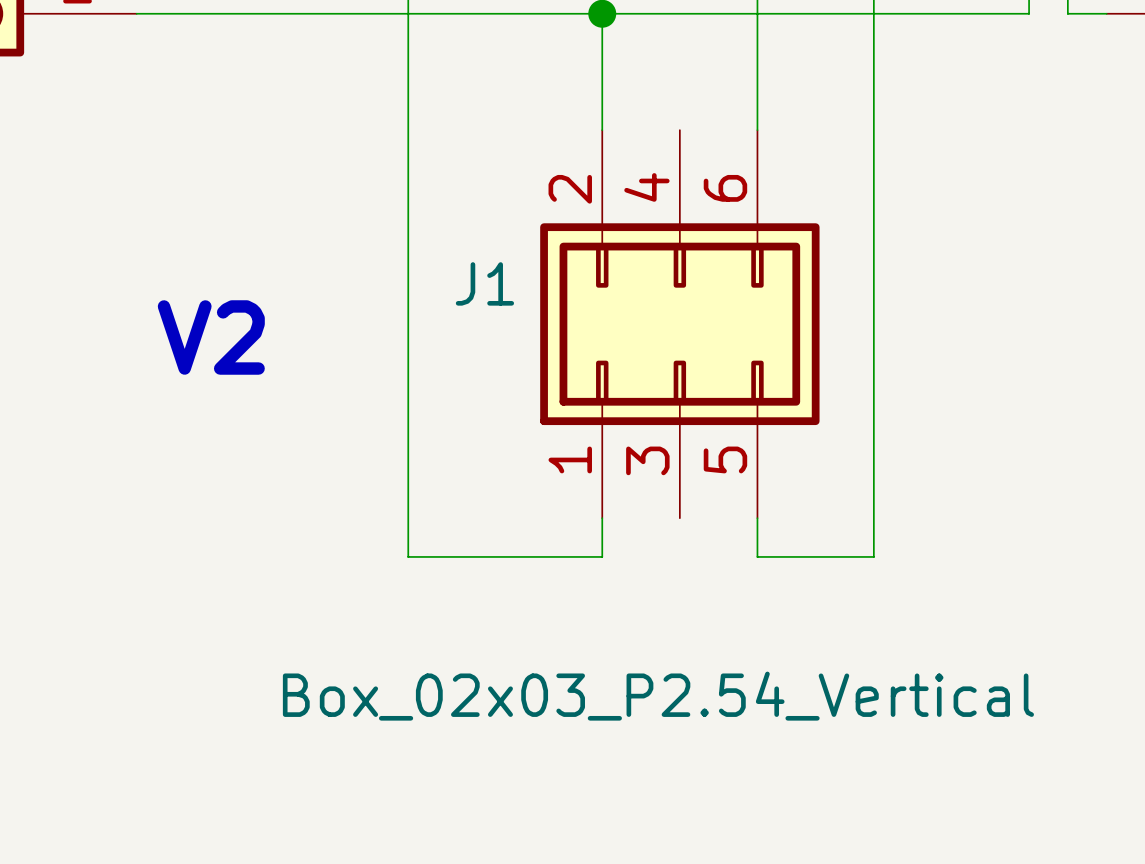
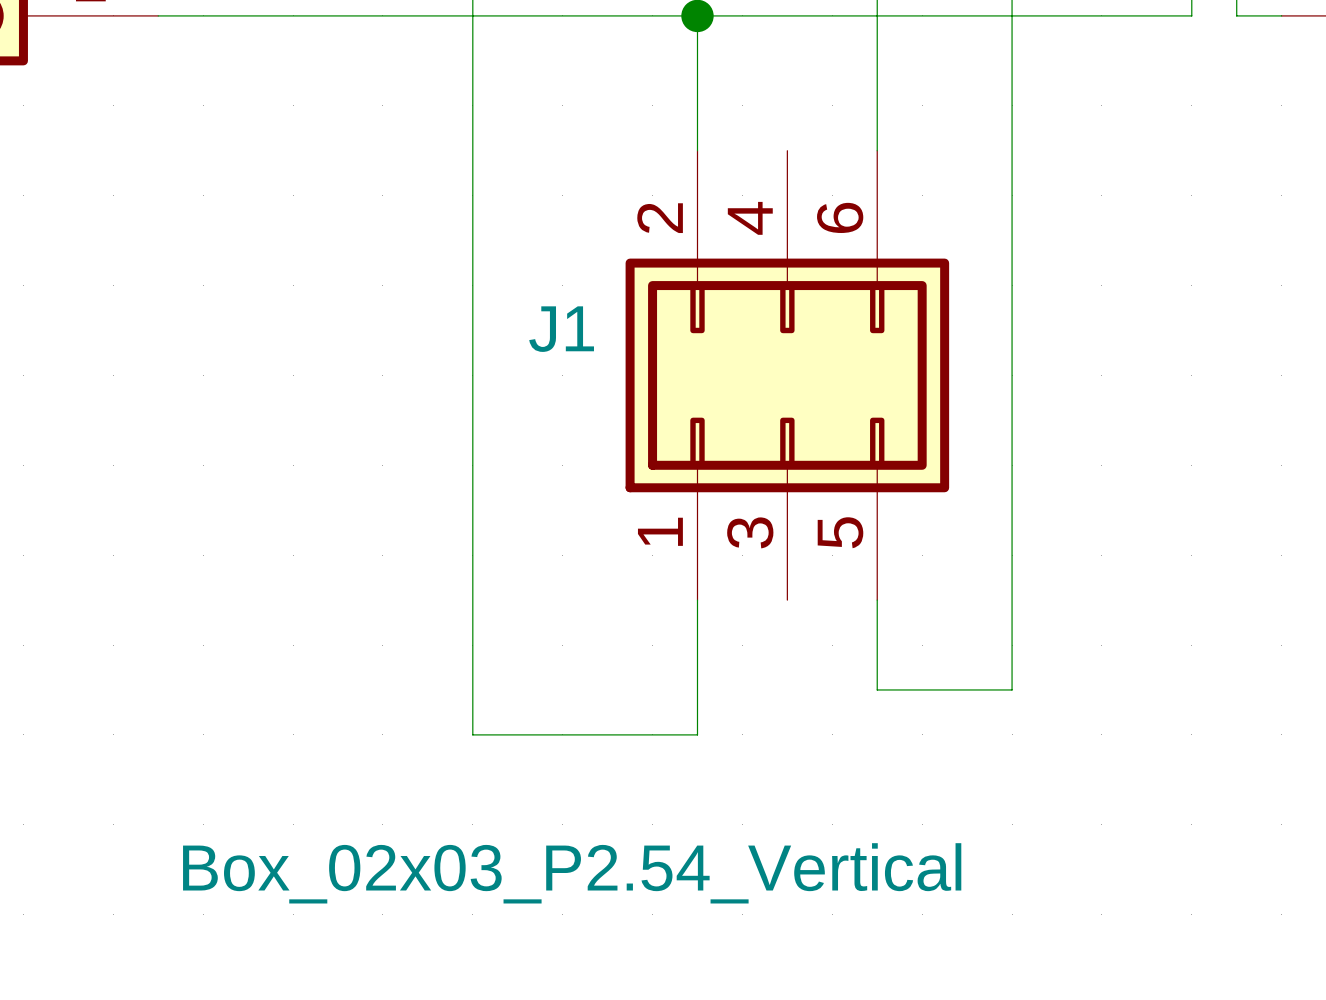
text: V2 (211, 337) -> none
wire: (408, 556) (602, 556) -> (472, 645) (472, 734) (697, 734) (697, 645)
wire: (757, 556) (873, 556) -> (877, 645) (877, 689) (1012, 689) (1012, 645)
J1 value position: Box_02x03_P2.54_Vertical (658, 696) -> Box_02x03_P2.54_Vertical (572, 873)

